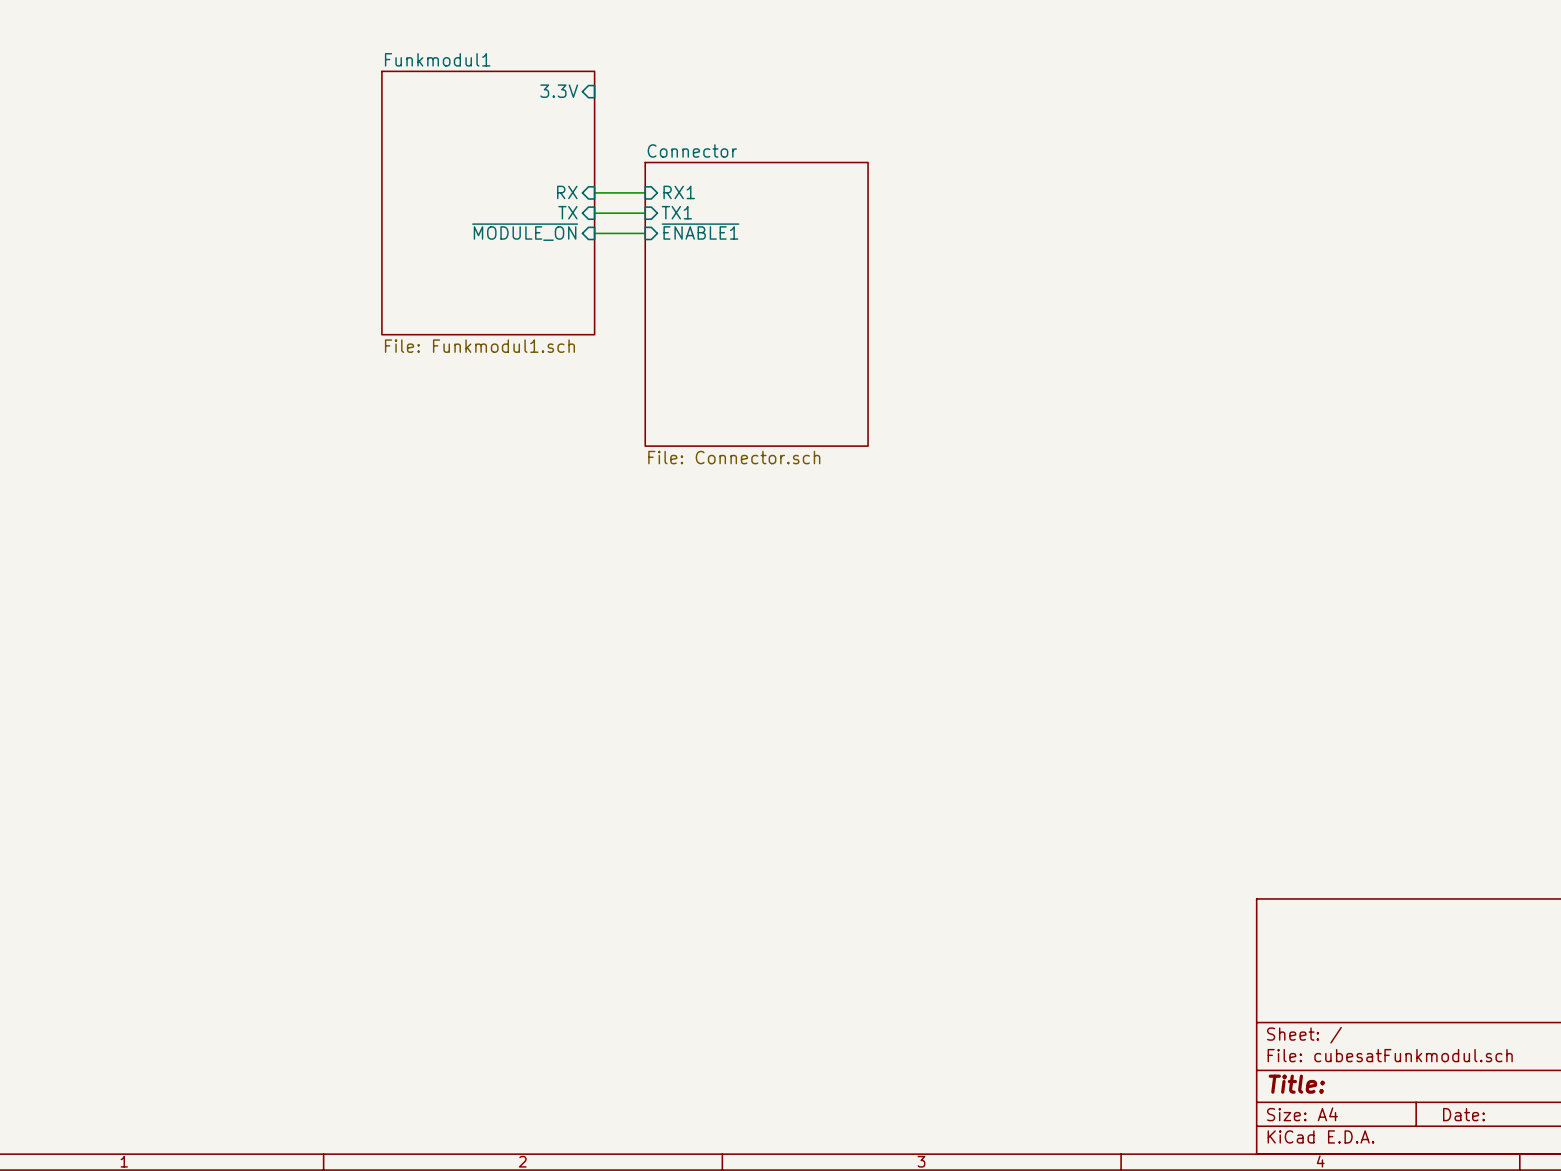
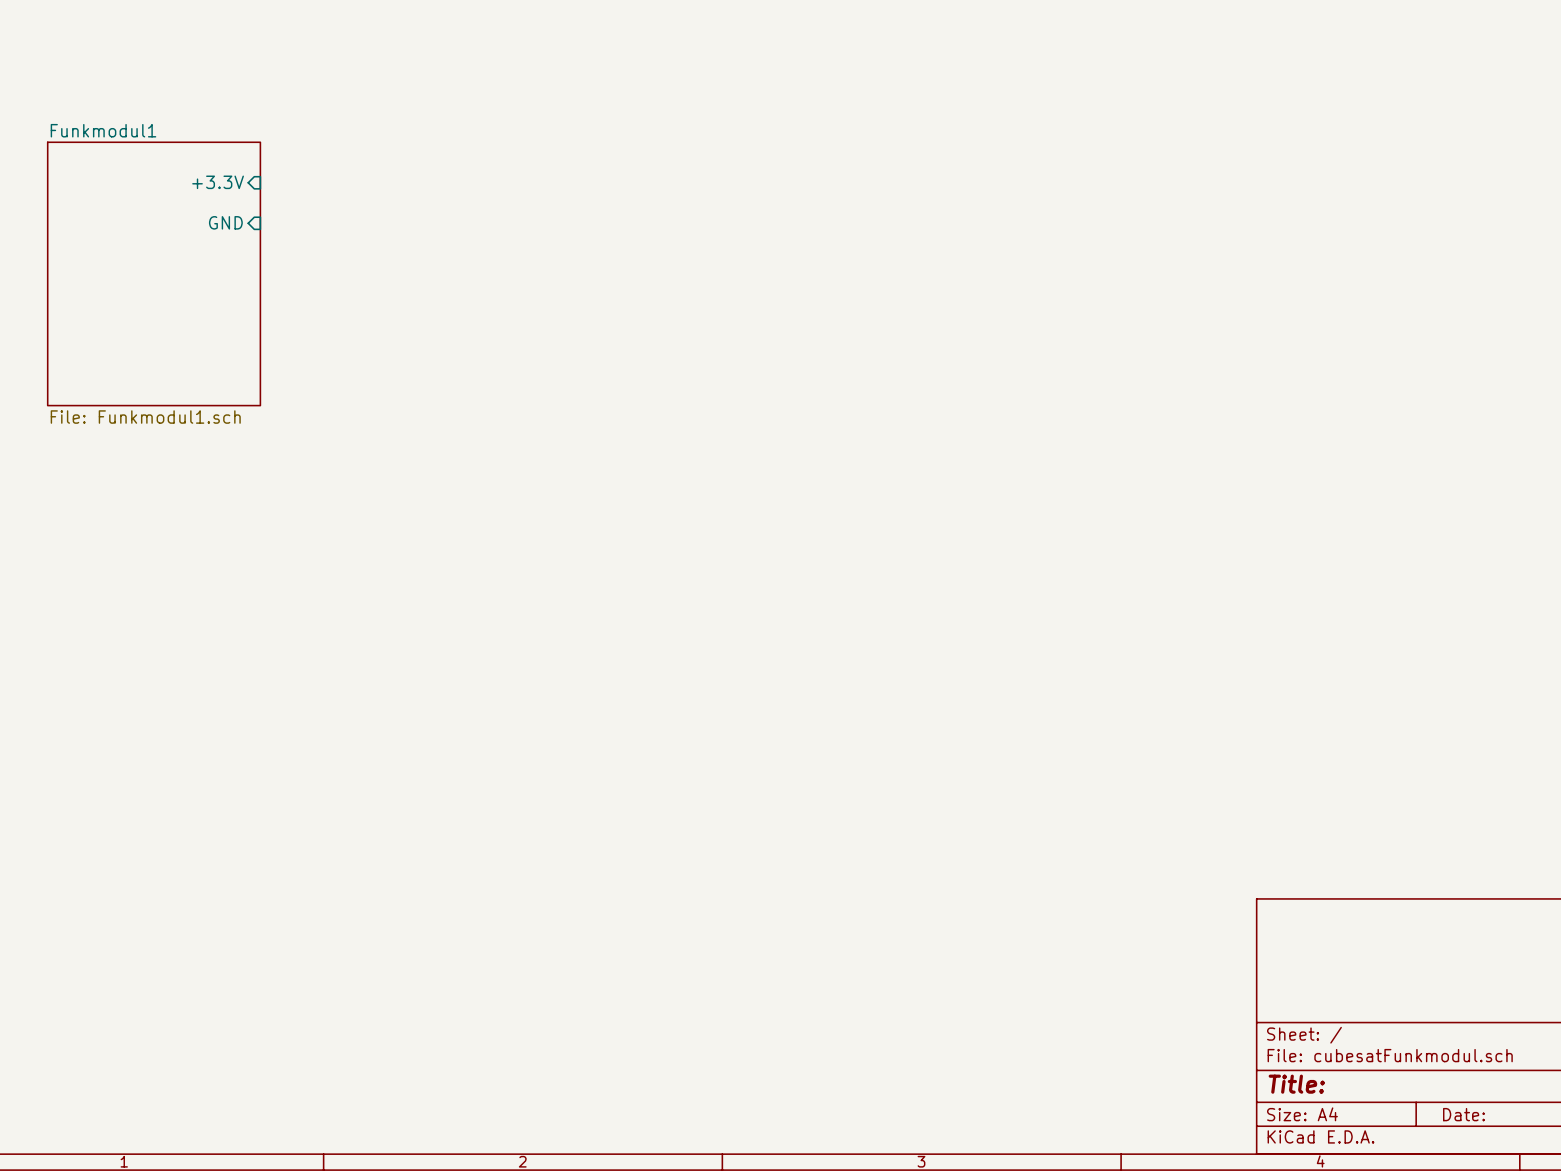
sheet pin: 3.3V (559, 91) -> none
sheet pin: none -> +3.3V (218, 182)
sheet pin: RX (567, 192) -> none
wire: (594, 192) (645, 192) -> none
sheet pin: RX1 (679, 192) -> none
sheet Funkmodul1 position: (488, 203) -> (154, 273)
sheet pin: TX (567, 212) -> none
sheet pin: TX1 (676, 212) -> none
wire: (594, 213) (645, 213) -> none
sheet pin: none -> GND (225, 222)
sheet pin: ~{ENABLE1} (700, 231) -> none
sheet pin: ~{MODULE_ON} (525, 232) -> none
wire: (594, 233) (645, 233) -> none
sheet Connector: File: Connector.sch (756, 304) -> none

